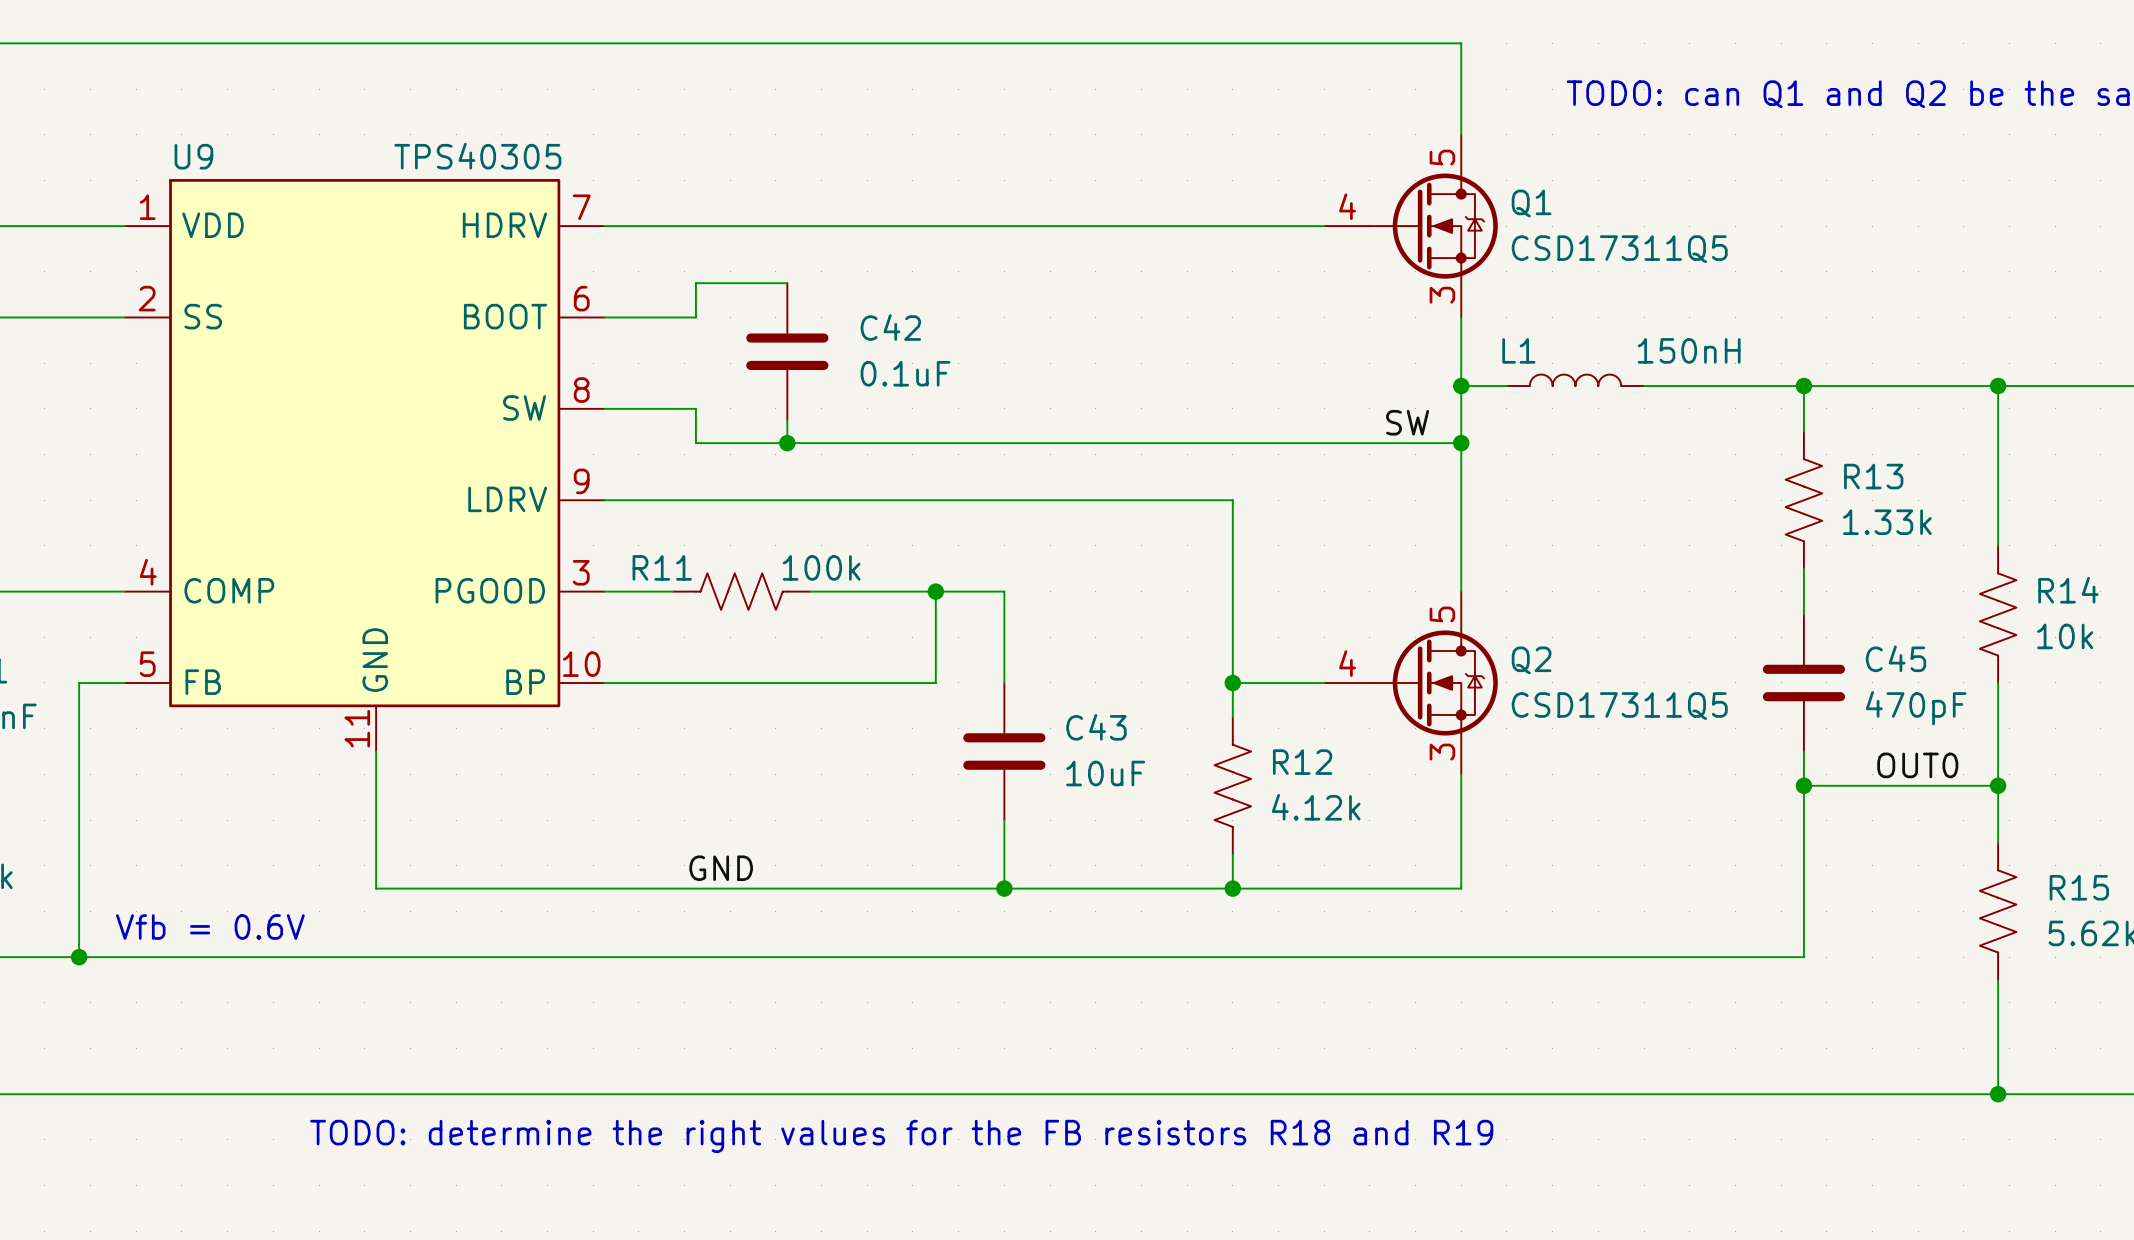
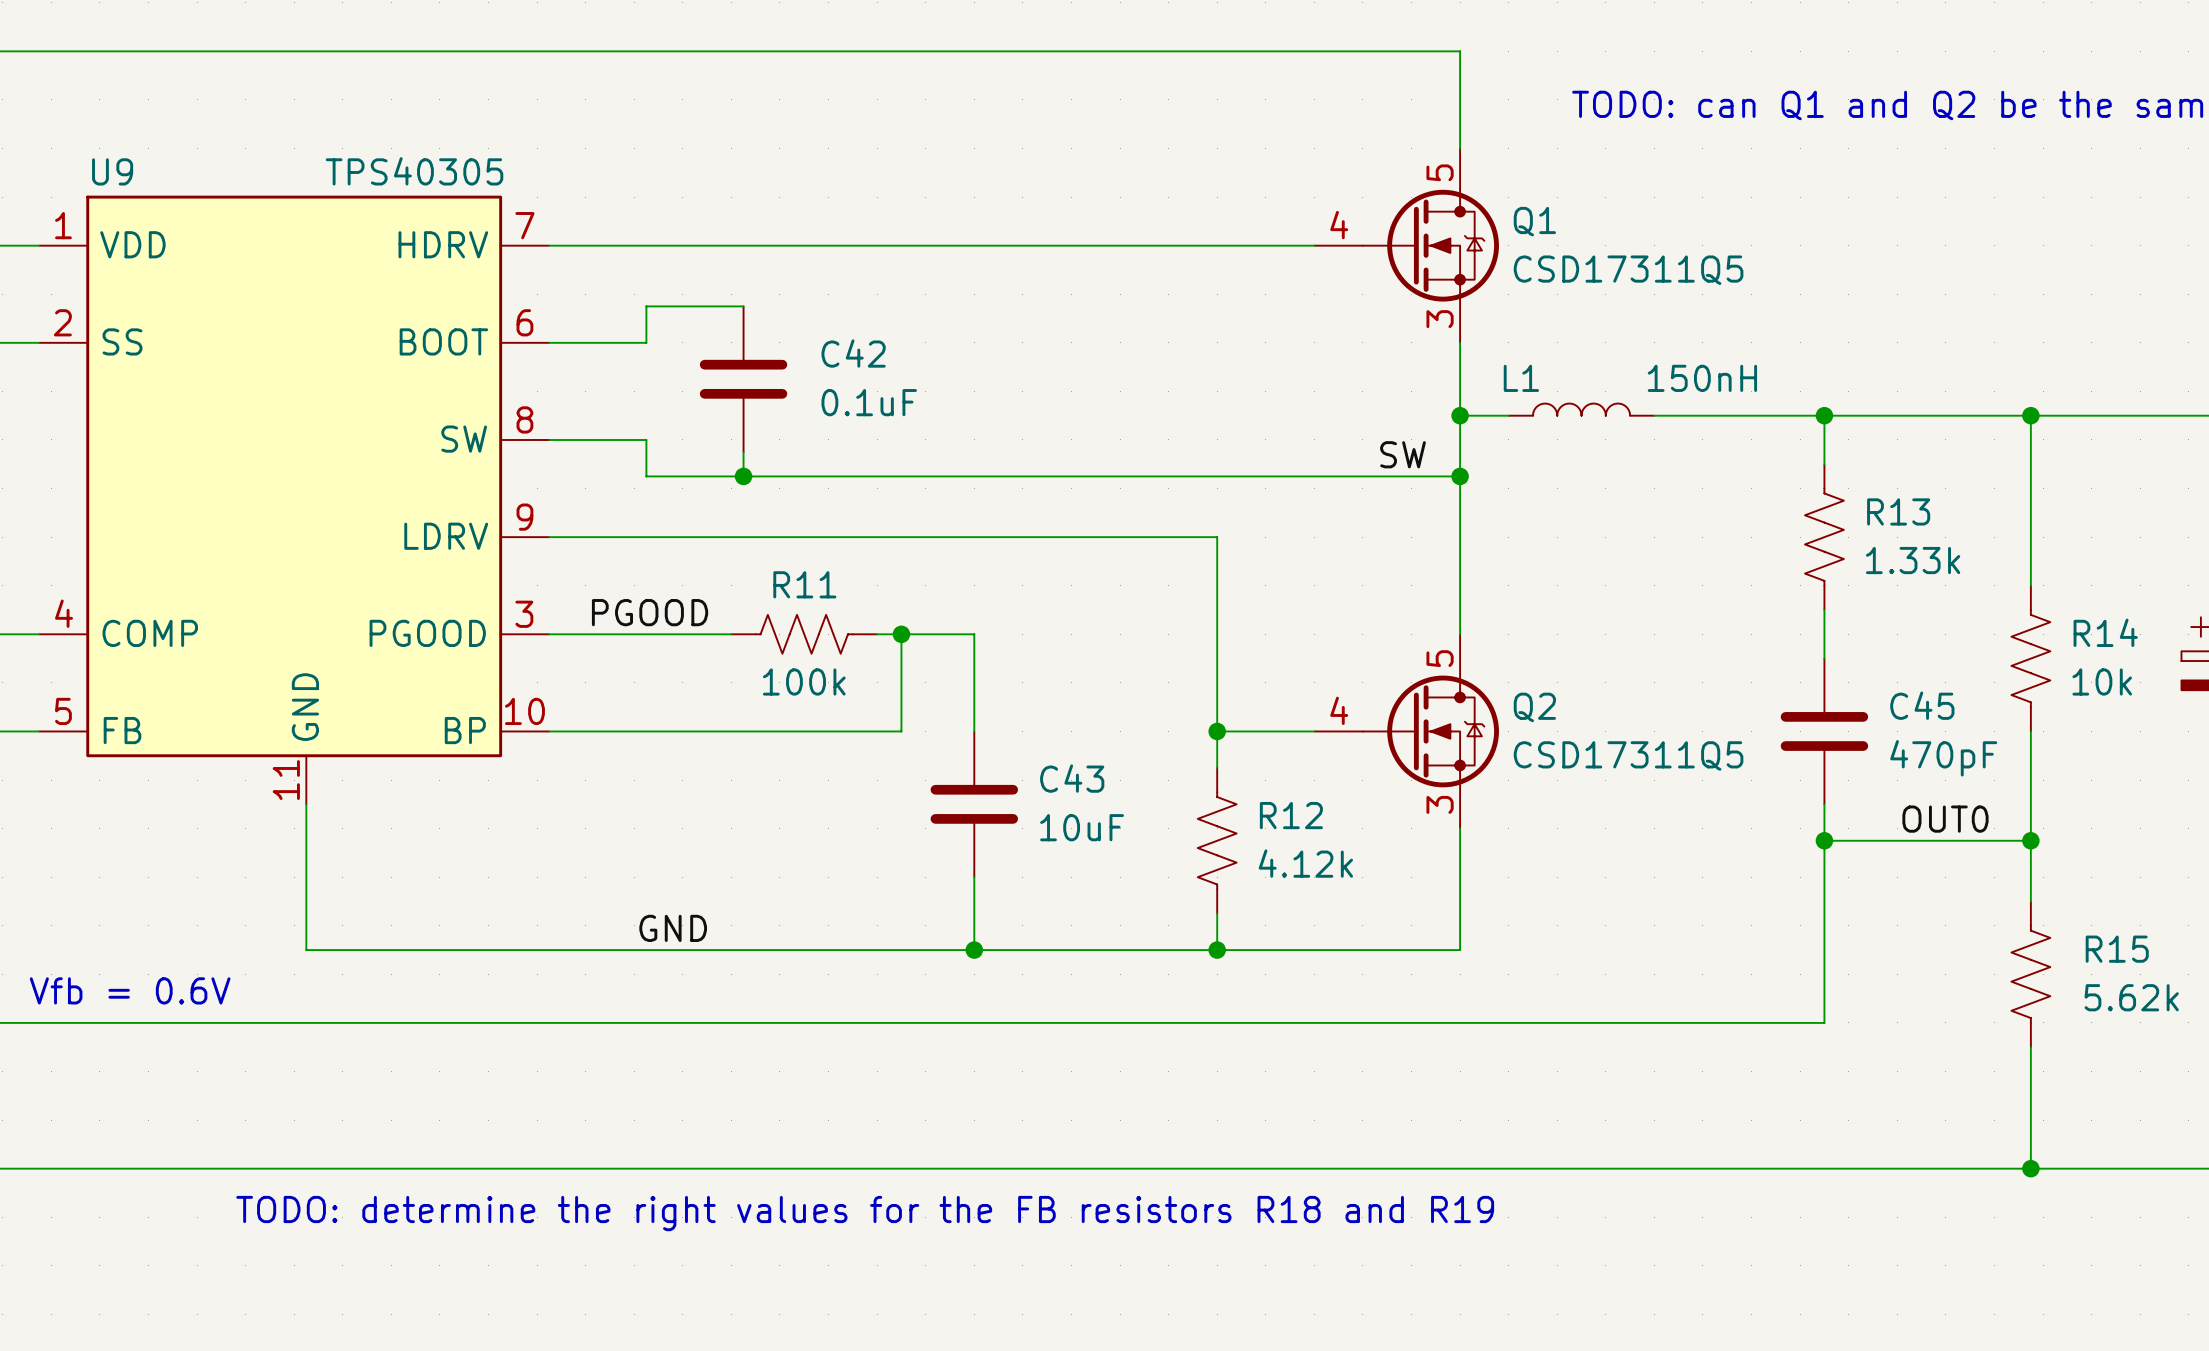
R11 name position: R11 (662, 567) -> R11 (804, 584)
R11 value position: 100k (821, 567) -> 100k (804, 681)
label: none -> PGOOD (650, 612)
R11 position: (741, 591) -> (804, 634)
wire: (810, 591) (912, 591) -> (622, 634) (731, 634)

